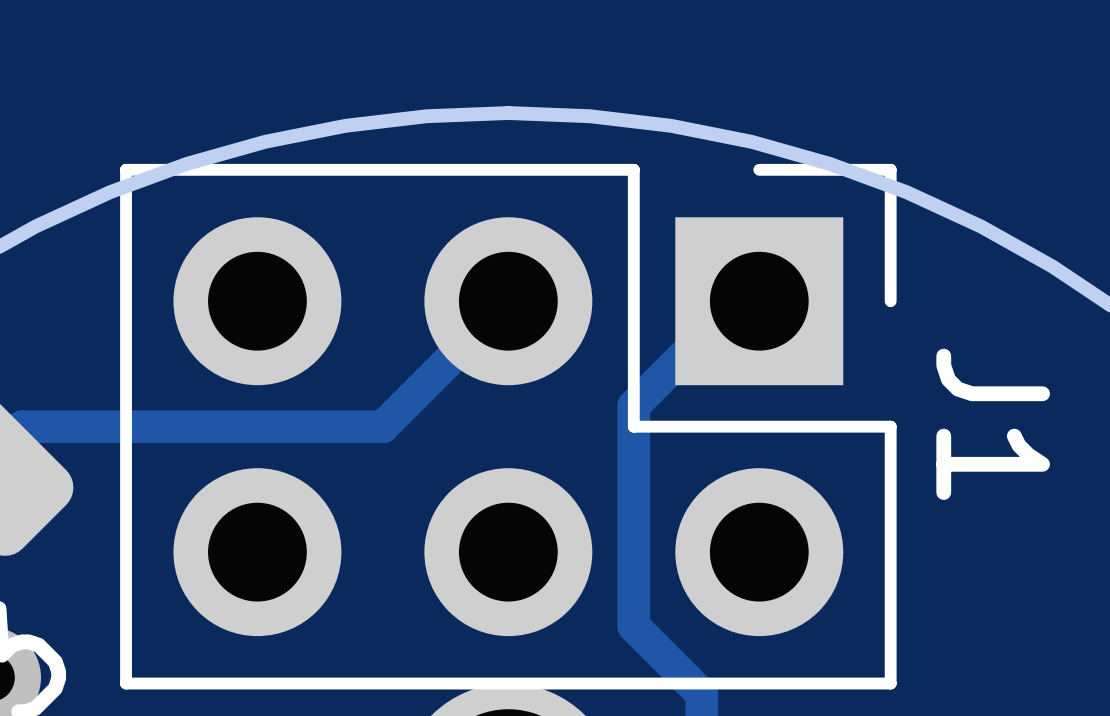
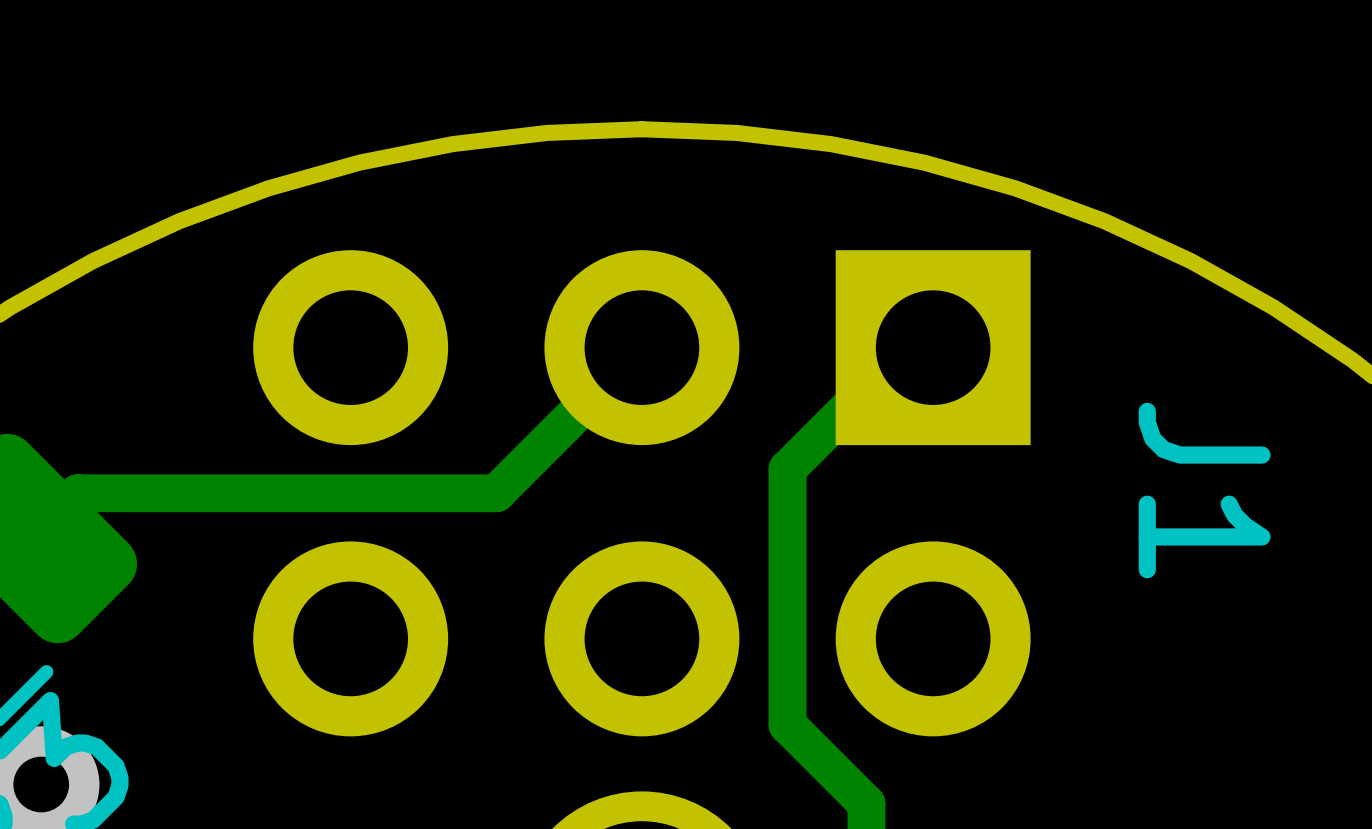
J1 footprint: [120, 163, 897, 690] -> [253, 250, 1031, 737]

